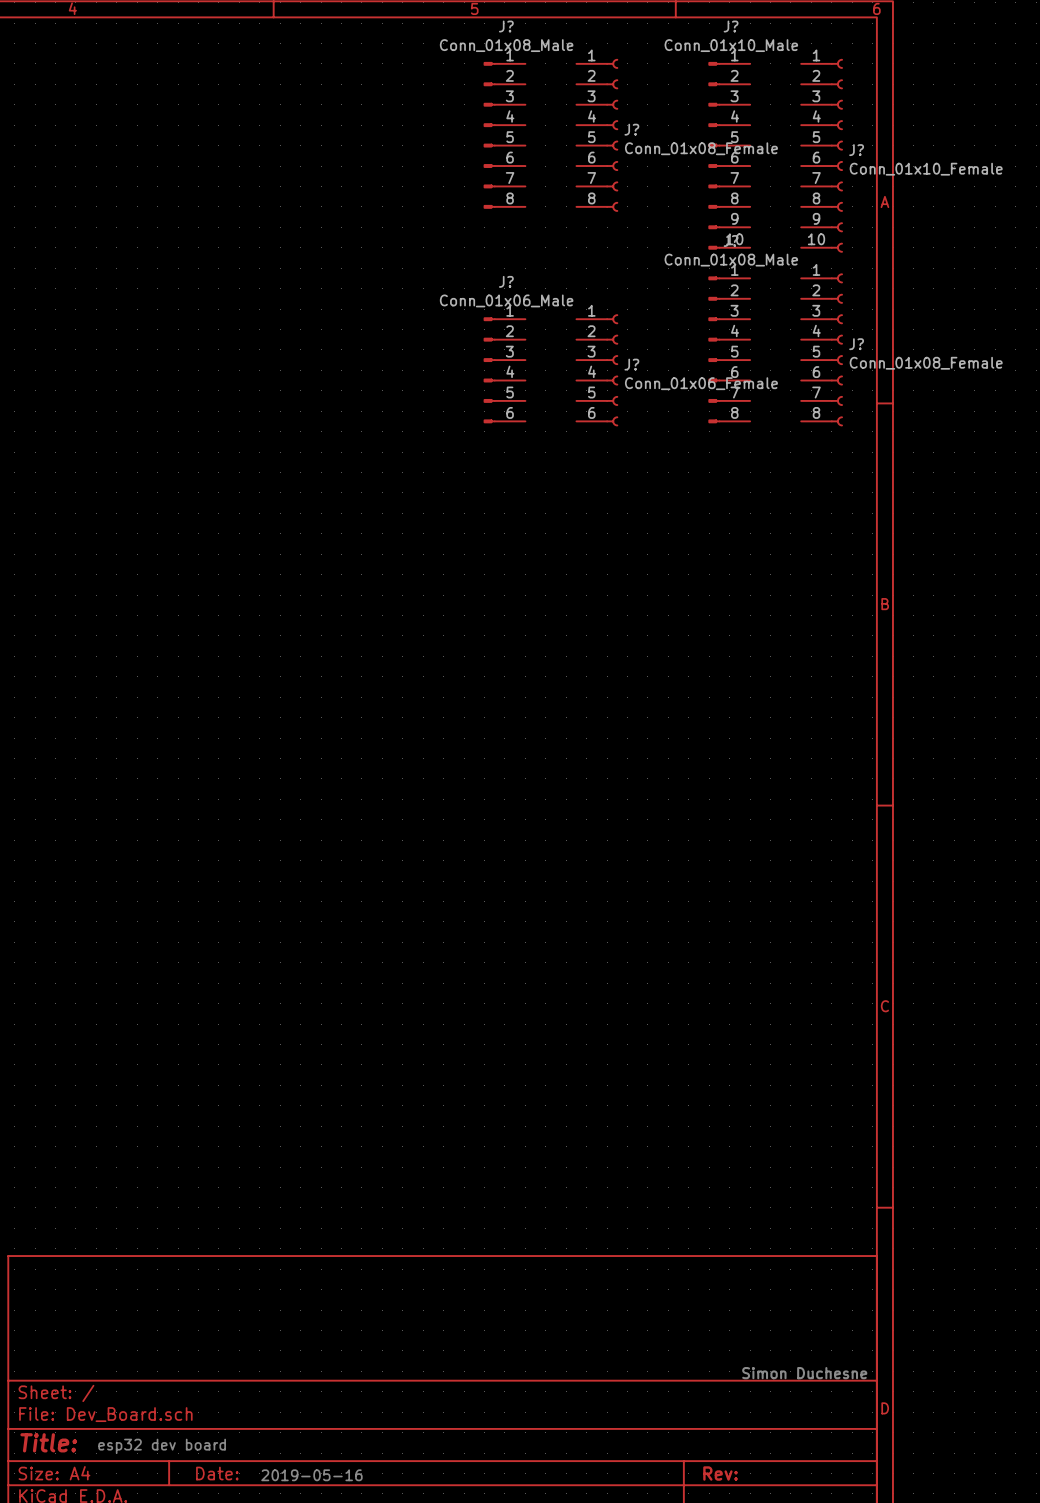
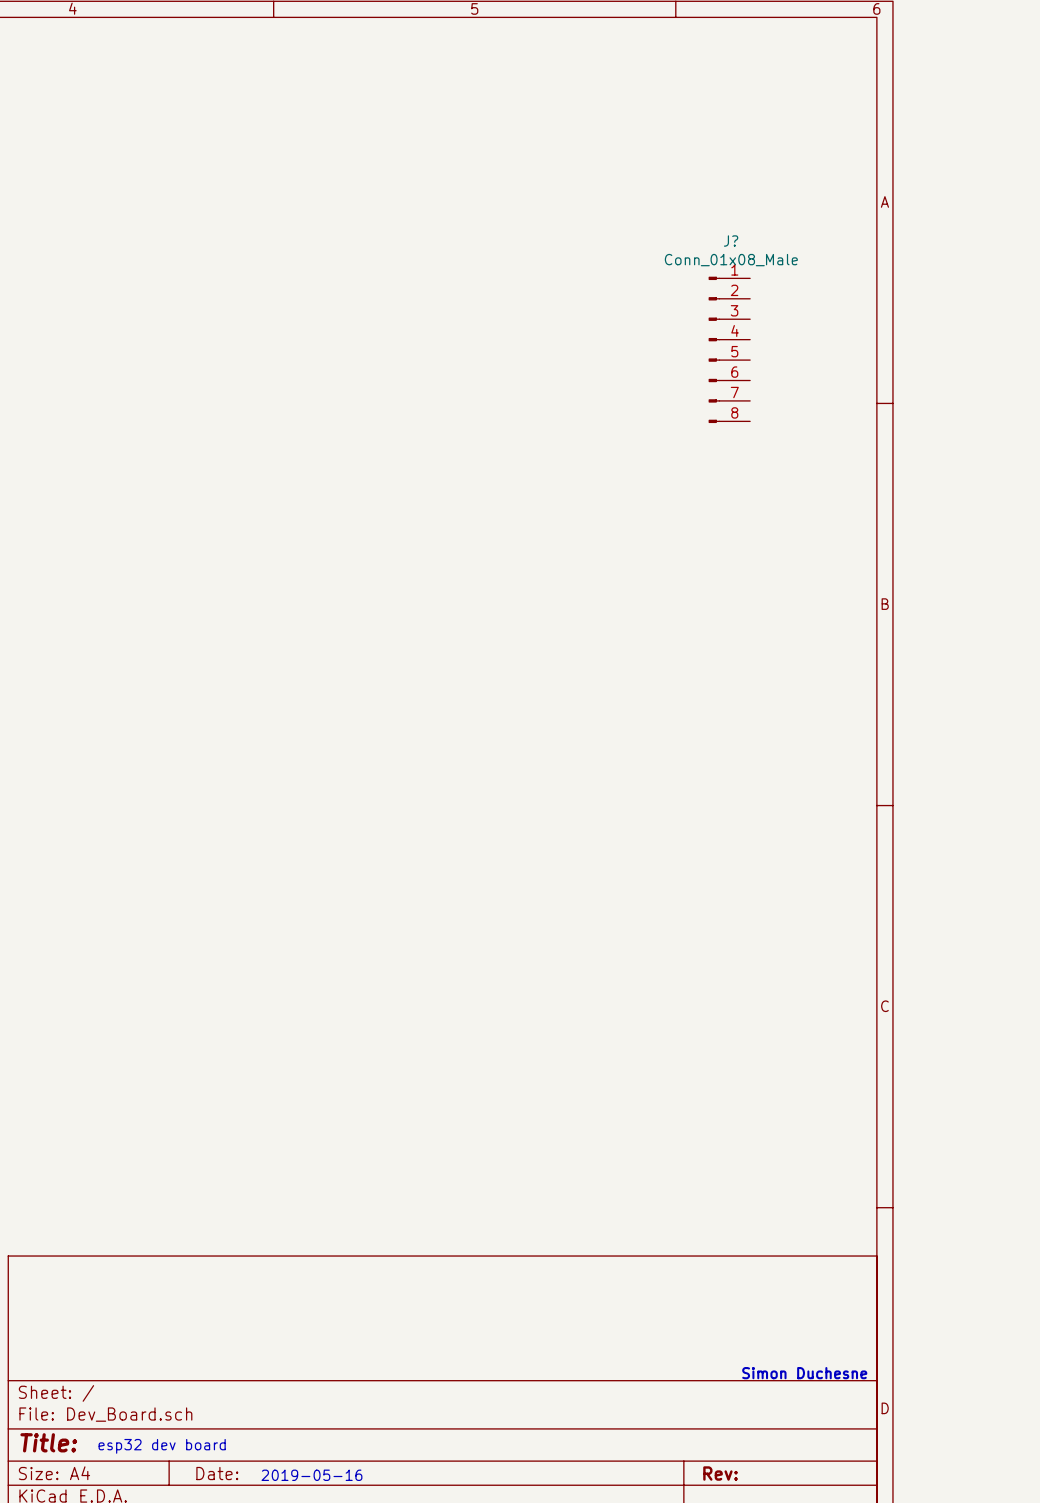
J?: Conn_01x08_Male (504, 135) -> none
J?: Conn_01x08_Female (597, 135) -> none
J?: Conn_01x10_Male (729, 155) -> none
J?: Conn_01x10_Female (821, 155) -> none
J?: Conn_01x08_Female (821, 349) -> none
J?: Conn_01x06_Male (504, 370) -> none
J?: Conn_01x06_Female (597, 370) -> none

